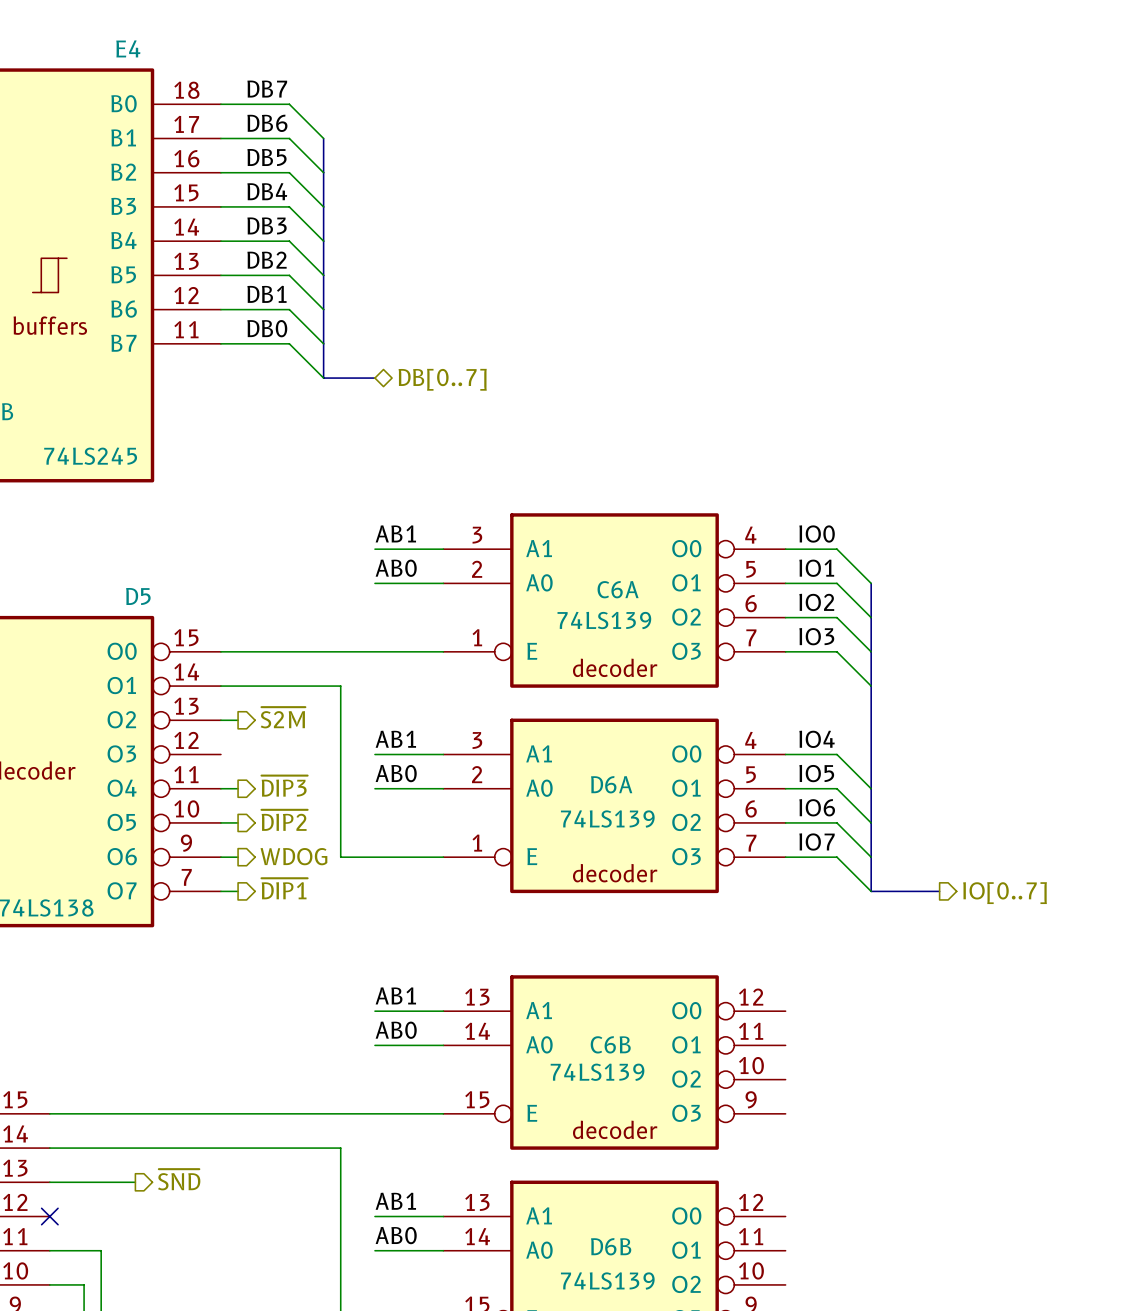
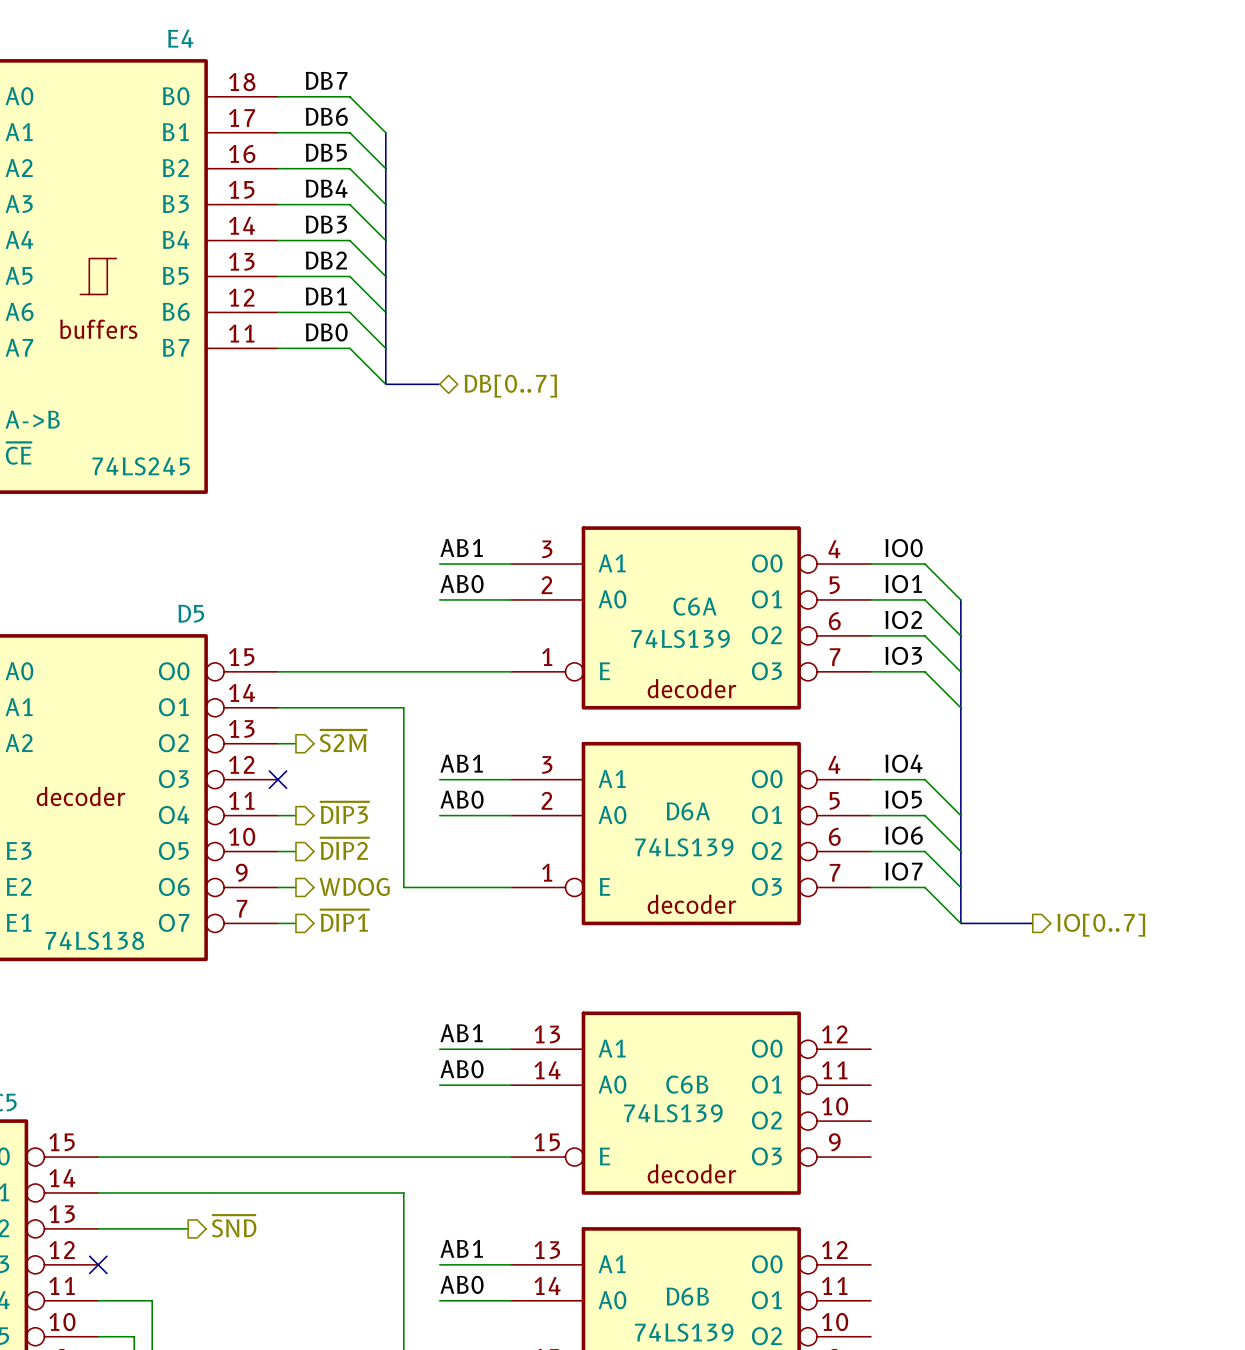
no-connect mark: none -> (277, 779)

